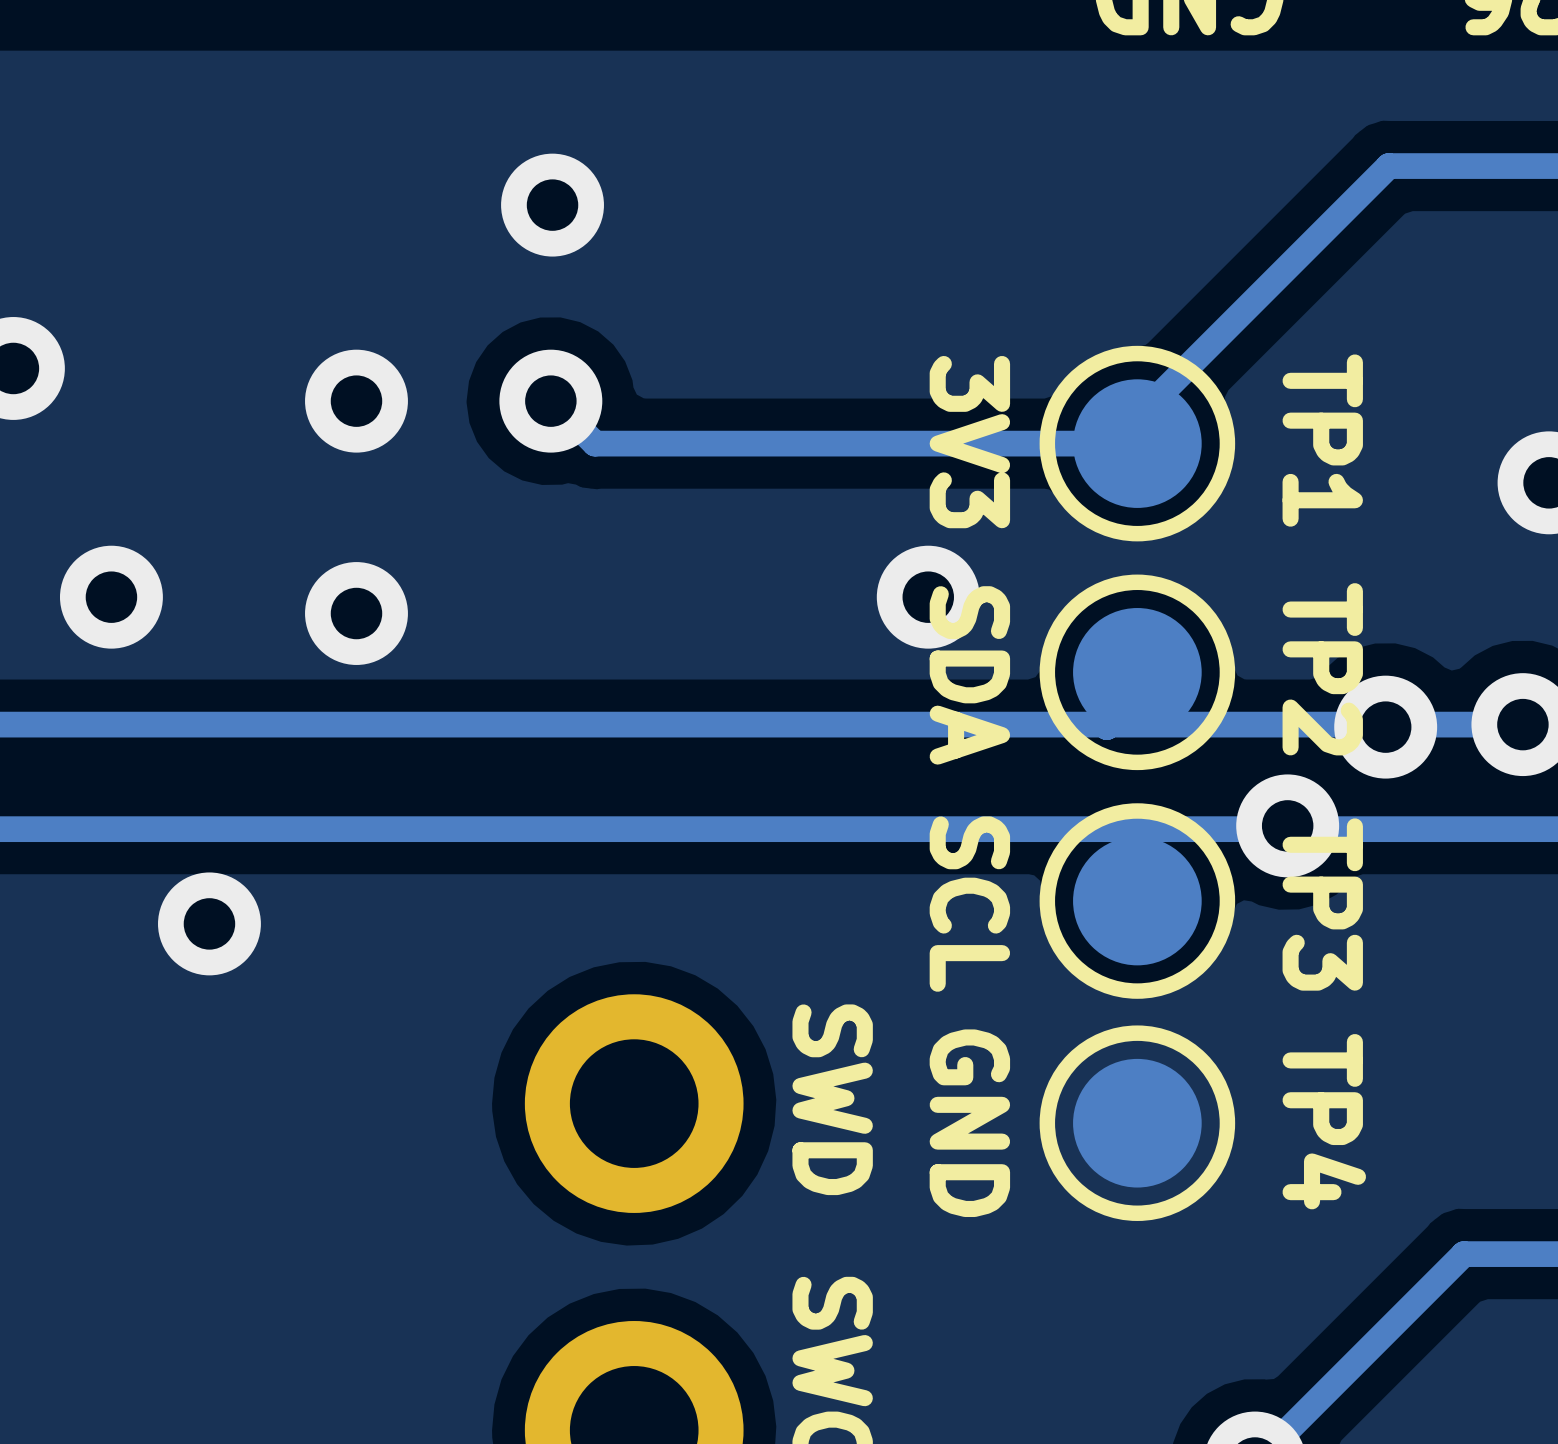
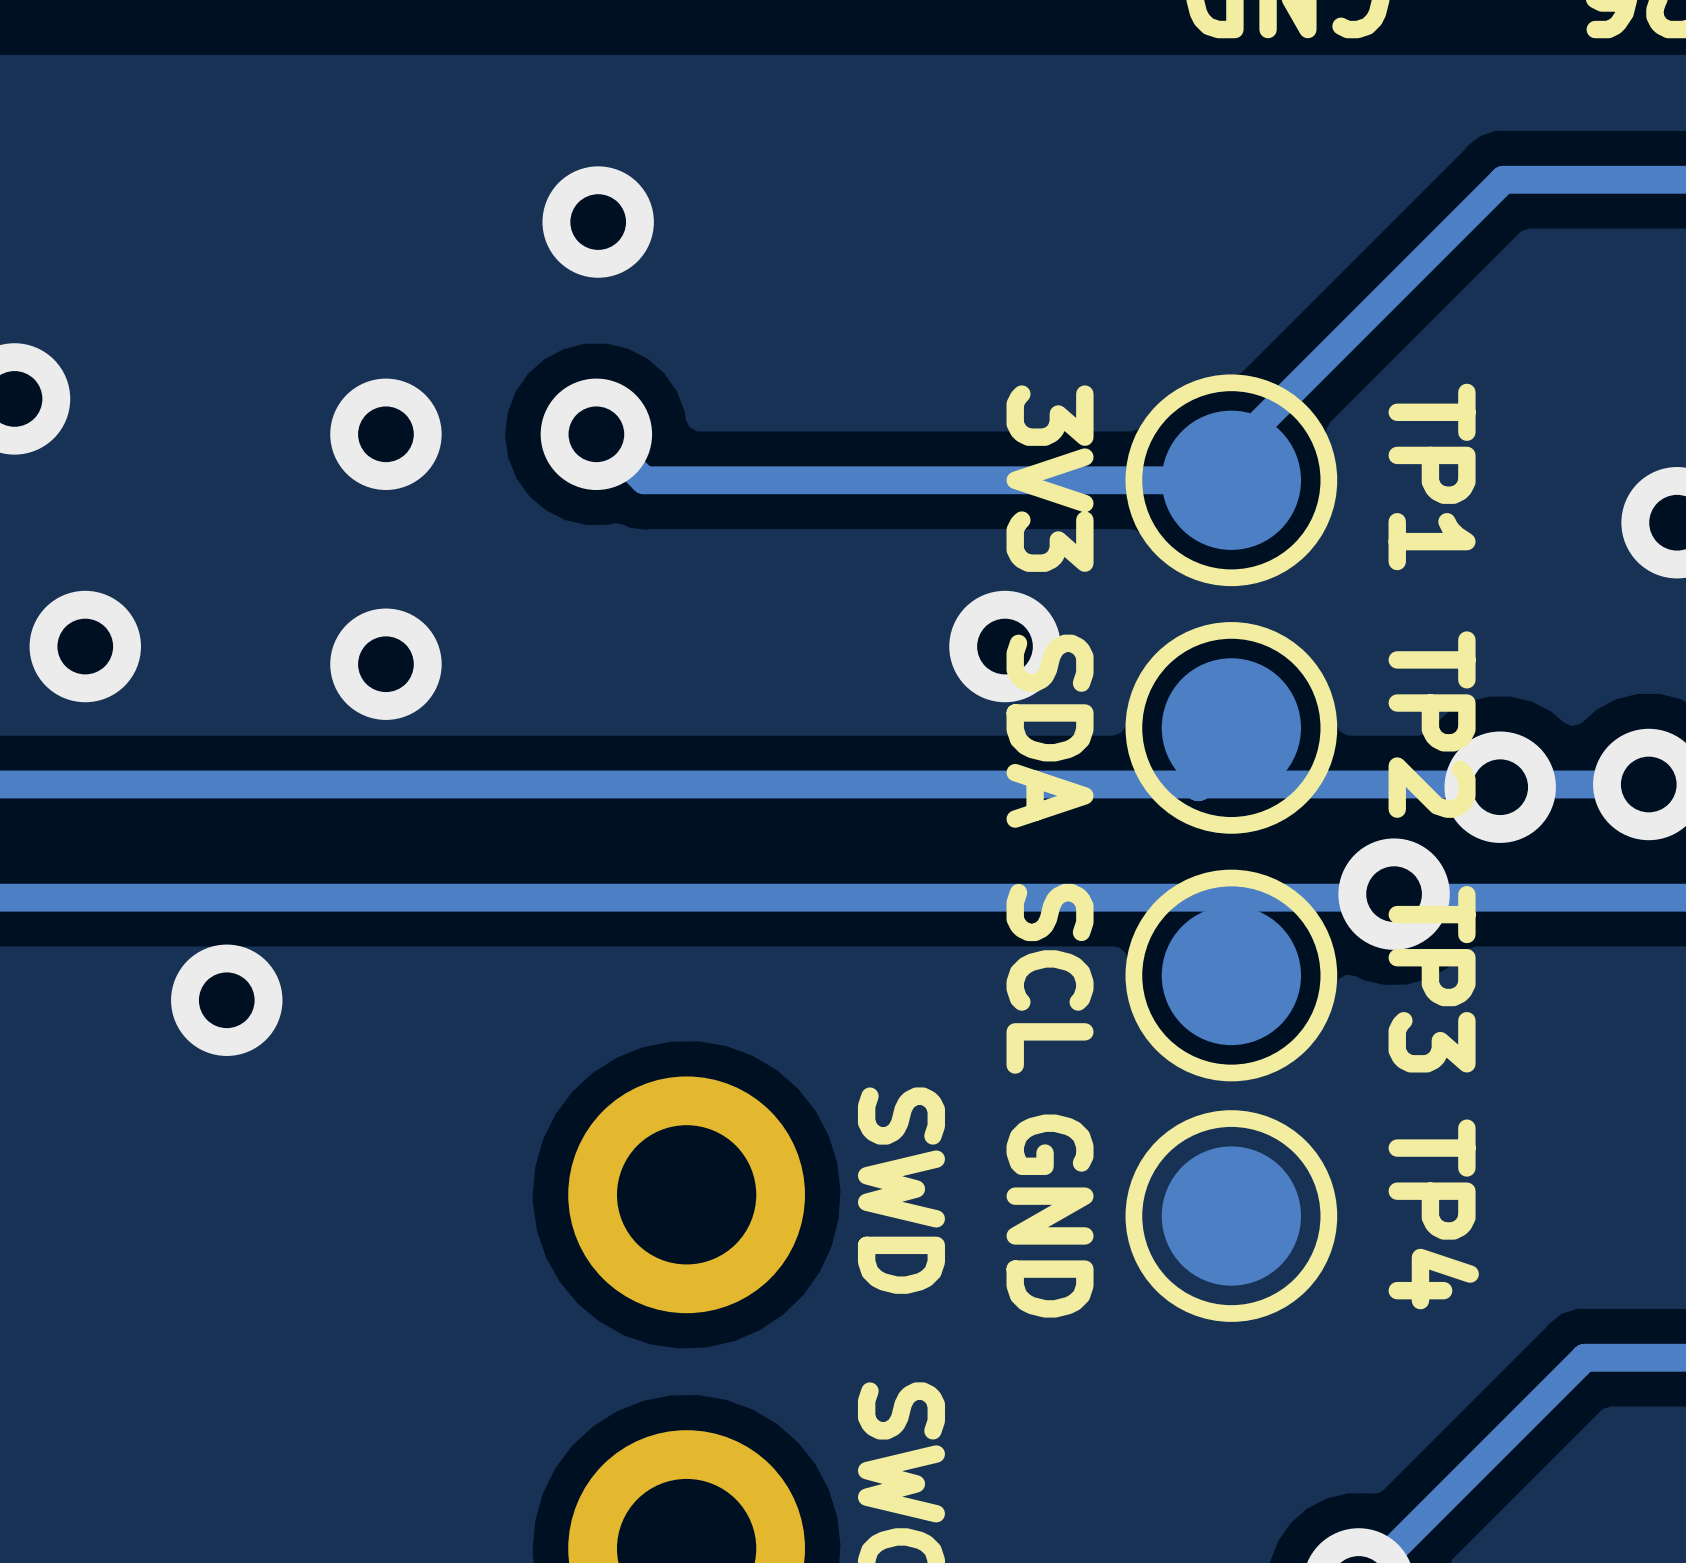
via position: (111, 597) -> (85, 646)

